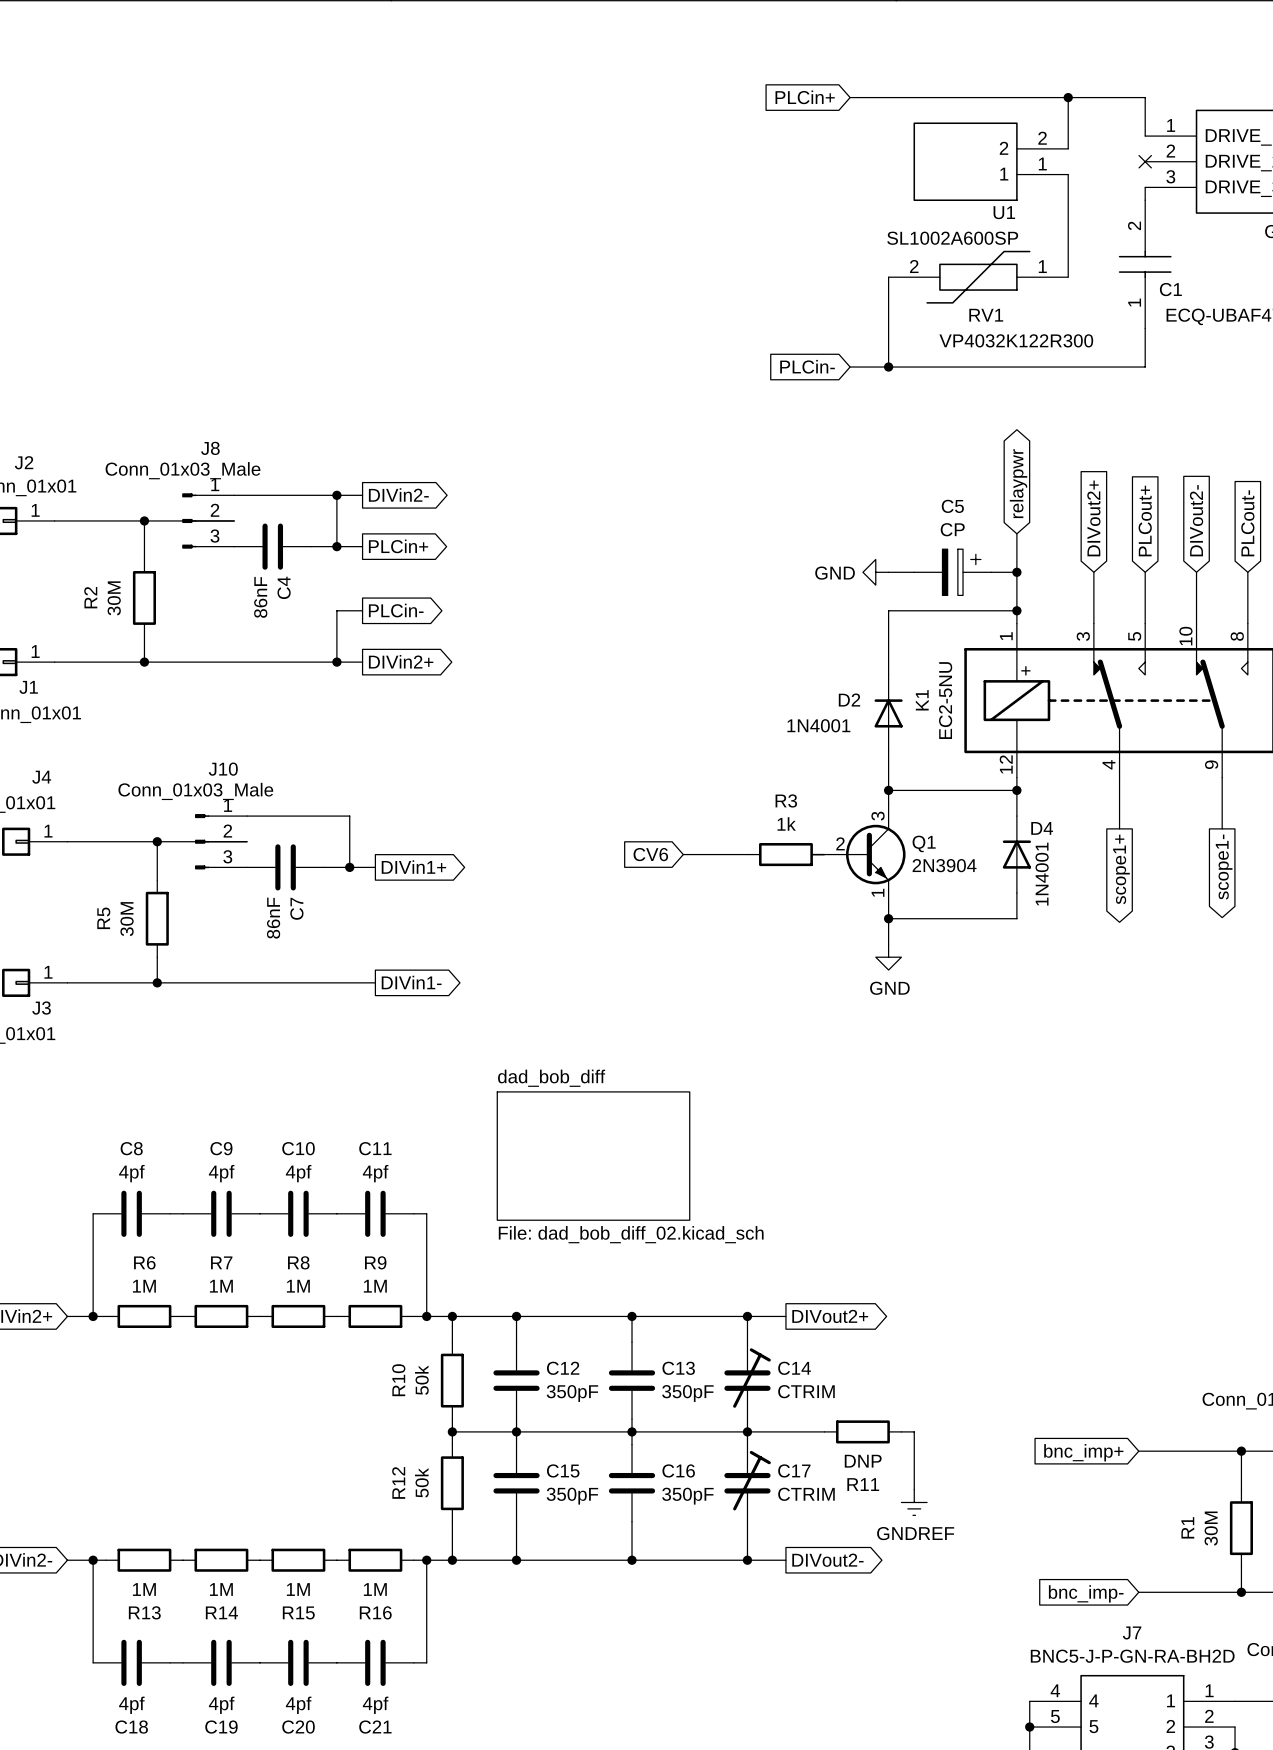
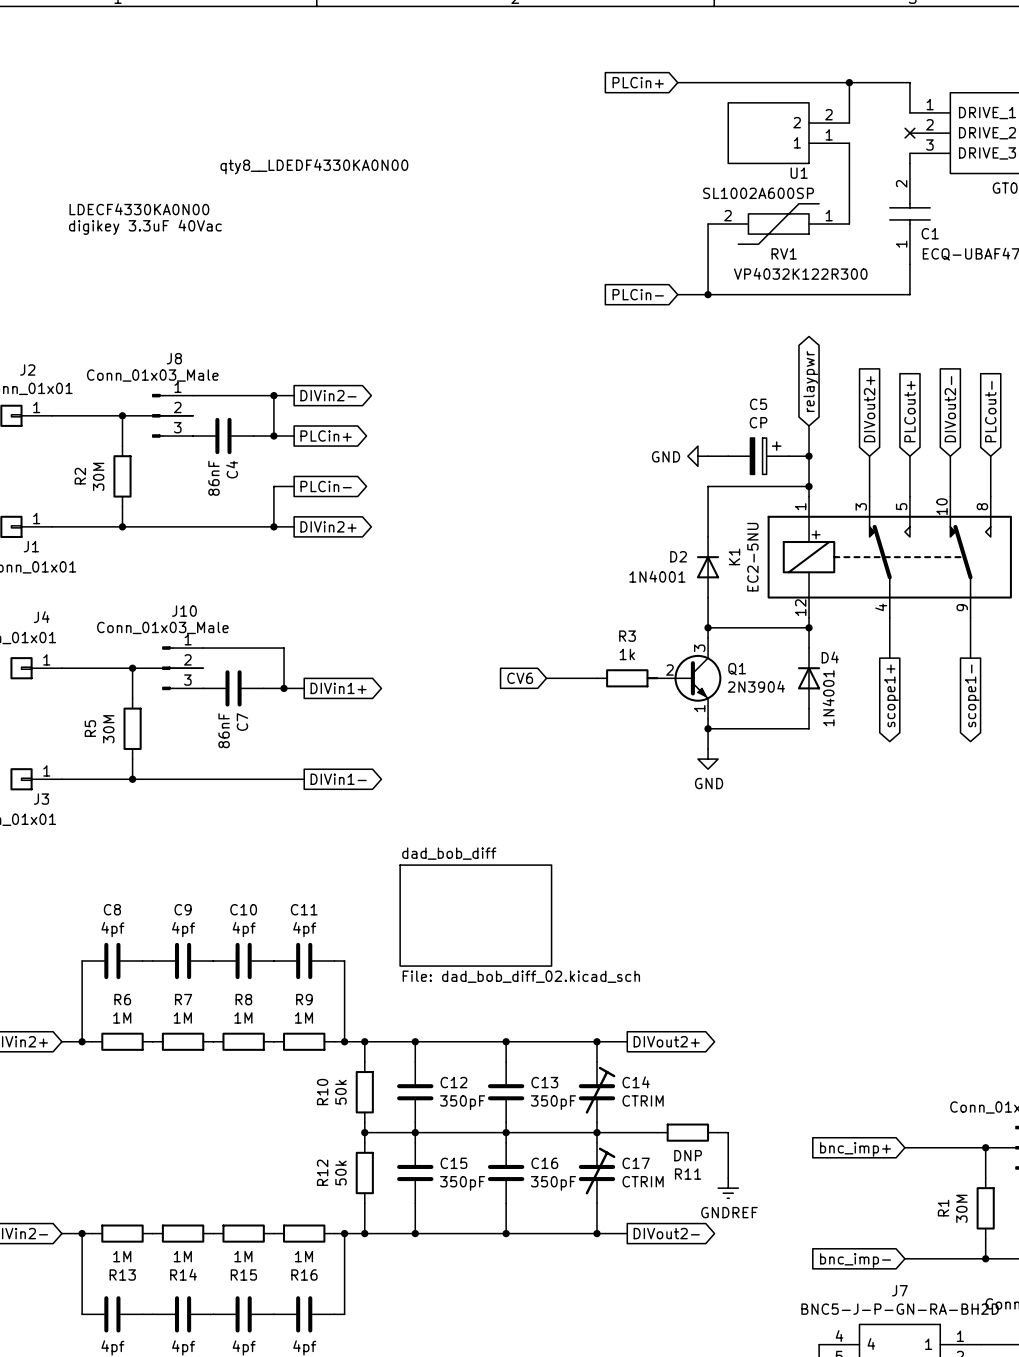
text: none -> qty8__LDEDF4330KA0N00 (314, 166)
text: none -> LDECF4330KA0N00 (139, 209)
text: none -> digikey 3.3uF 40Vac (145, 227)

